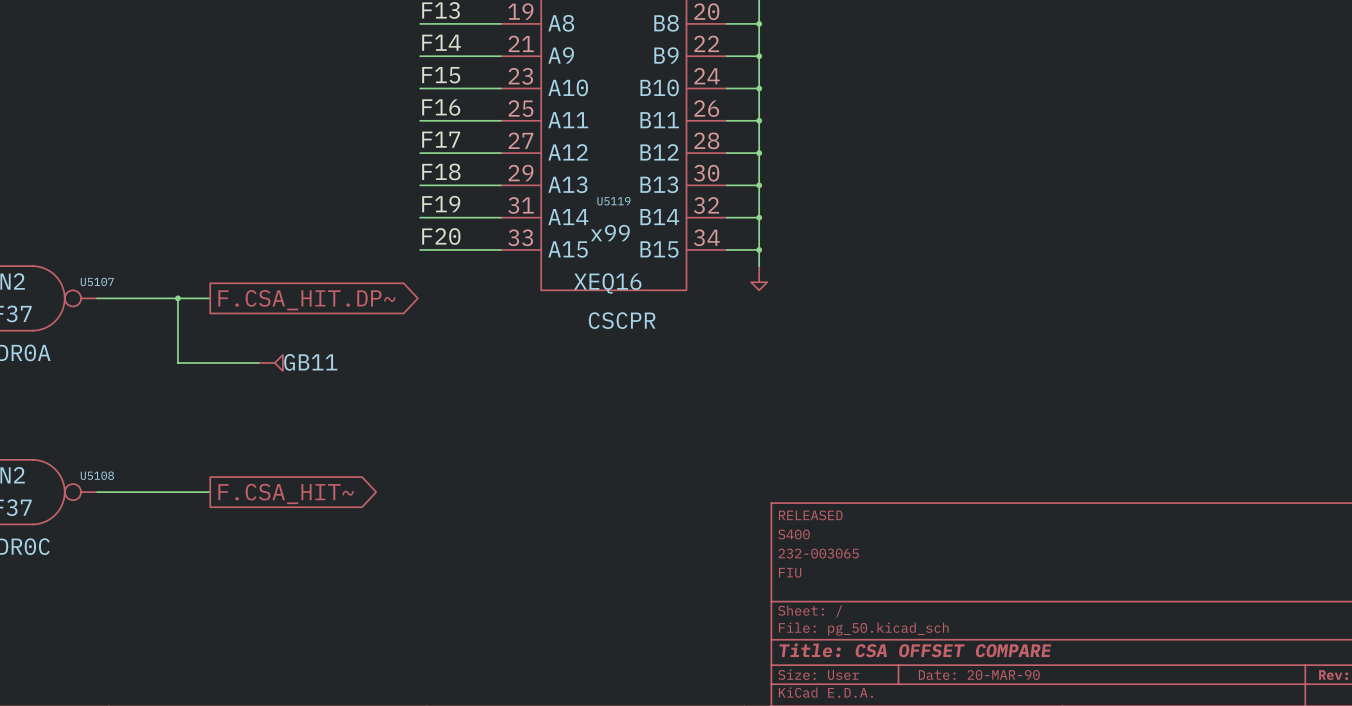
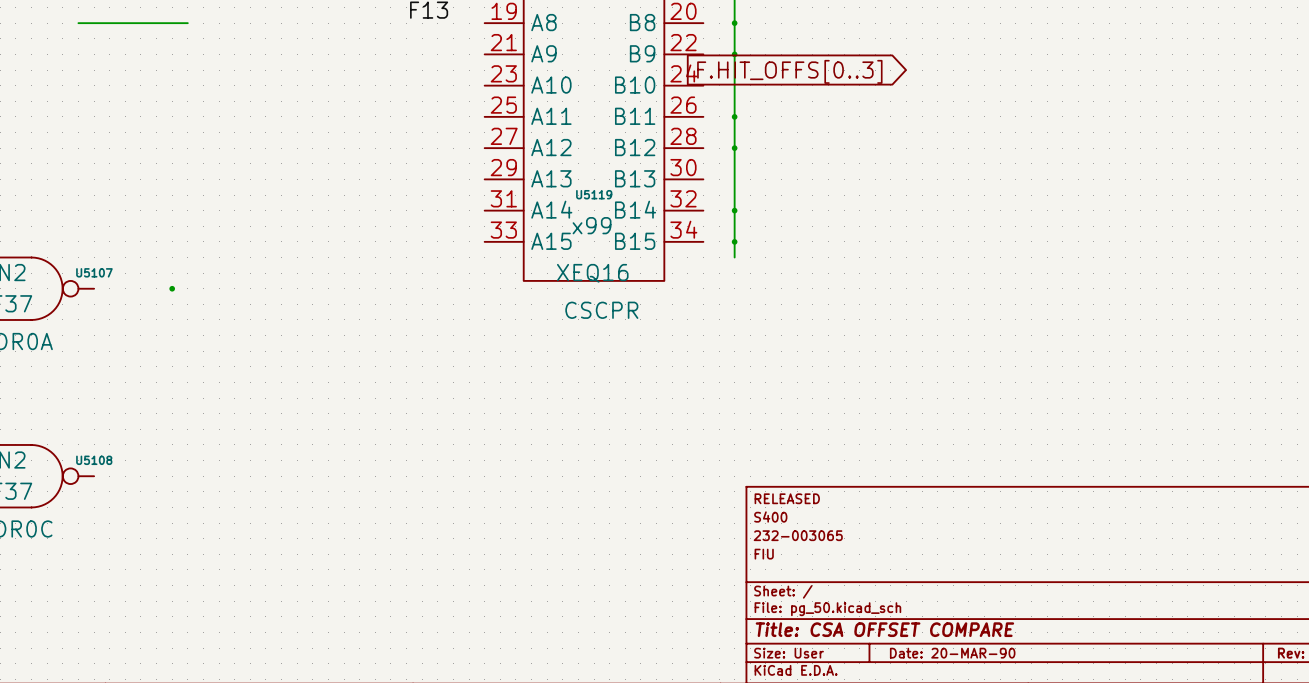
wire: none -> (78, 23) (187, 23)
wire: (420, 23) (500, 23) -> none
wire: (726, 23) (759, 23) -> none
label: F14 (441, 42) -> none
wire: (420, 56) (500, 56) -> none
wire: (726, 56) (759, 56) -> none
global label: none -> F.HIT_OFFS[0..3] (789, 71)
label: F15 (441, 75) -> none
wire: (420, 88) (500, 88) -> none
wire: (726, 88) (759, 88) -> none
junction: (759, 88) -> none
label: F16 (441, 107) -> none
wire: (420, 120) (500, 120) -> none
wire: (726, 120) (759, 120) -> none
label: F17 (441, 139) -> none
wire: (420, 153) (500, 153) -> none
wire: (726, 153) (759, 153) -> none
label: F18 (441, 171) -> none
wire: (420, 185) (500, 185) -> none
wire: (726, 185) (759, 185) -> none
junction: (759, 185) -> none
label: F19 (441, 204) -> none
wire: (420, 217) (500, 217) -> none
wire: (726, 217) (759, 217) -> none
label: F20 (441, 236) -> none
wire: (420, 249) (500, 249) -> none
wire: (726, 249) (759, 249) -> none
power symbol: (759, 278) -> none
wire: (97, 298) (210, 298) -> none
wire: (177, 298) (177, 362) (258, 362) -> none
global label: F.CSA_HIT.DP~ (306, 300) -> none
GB11: (271, 362) -> none
wire: (97, 492) (210, 492) -> none
global label: F.CSA_HIT~ (286, 493) -> none

